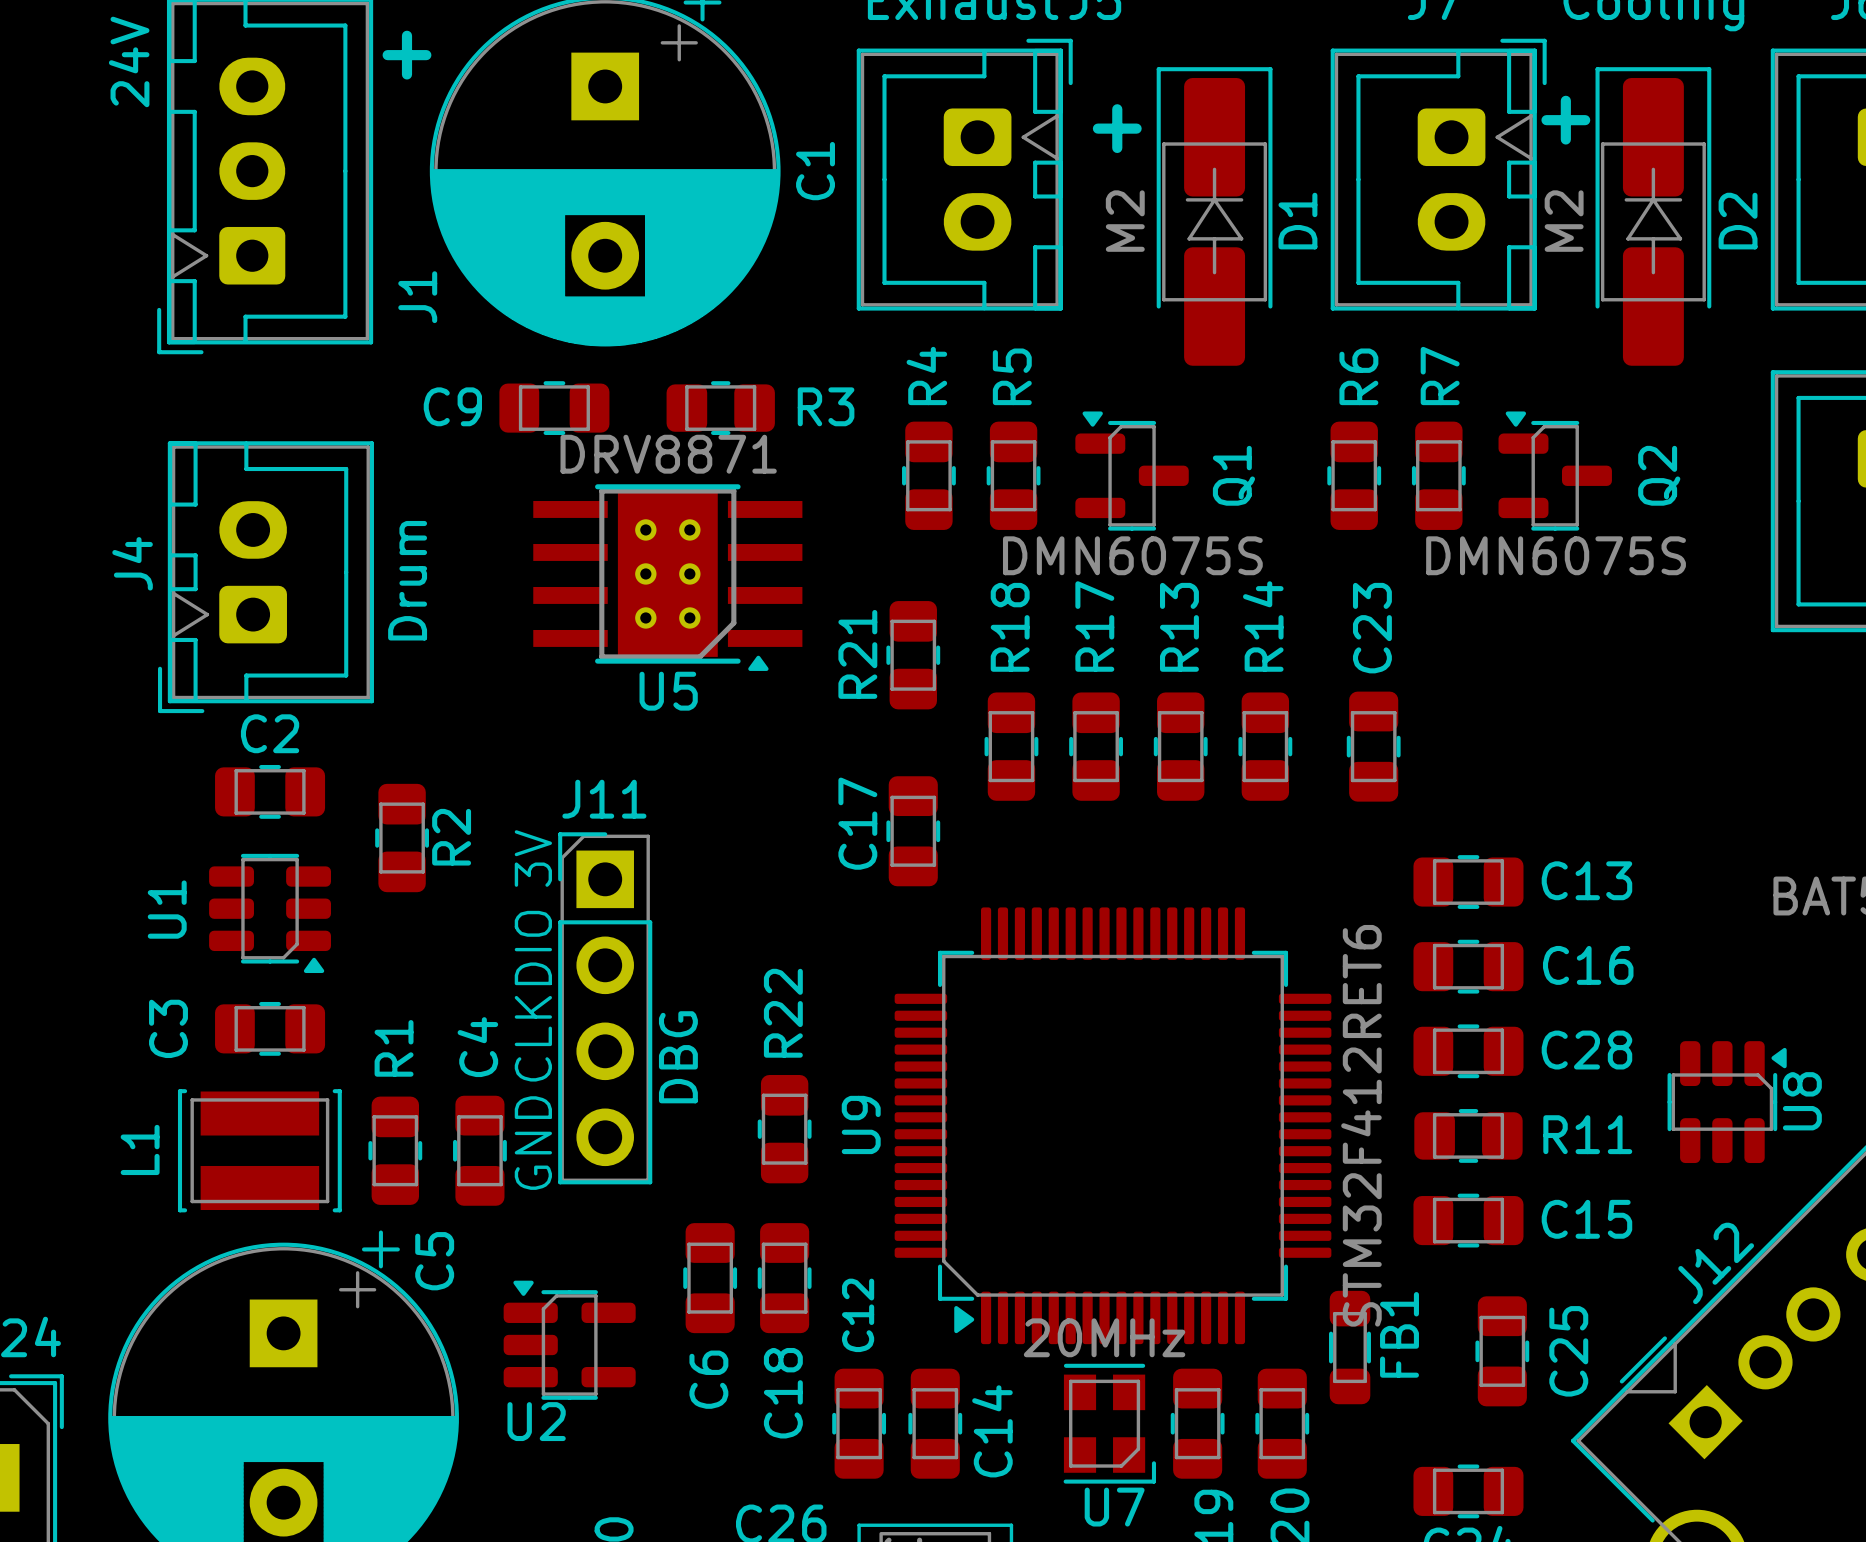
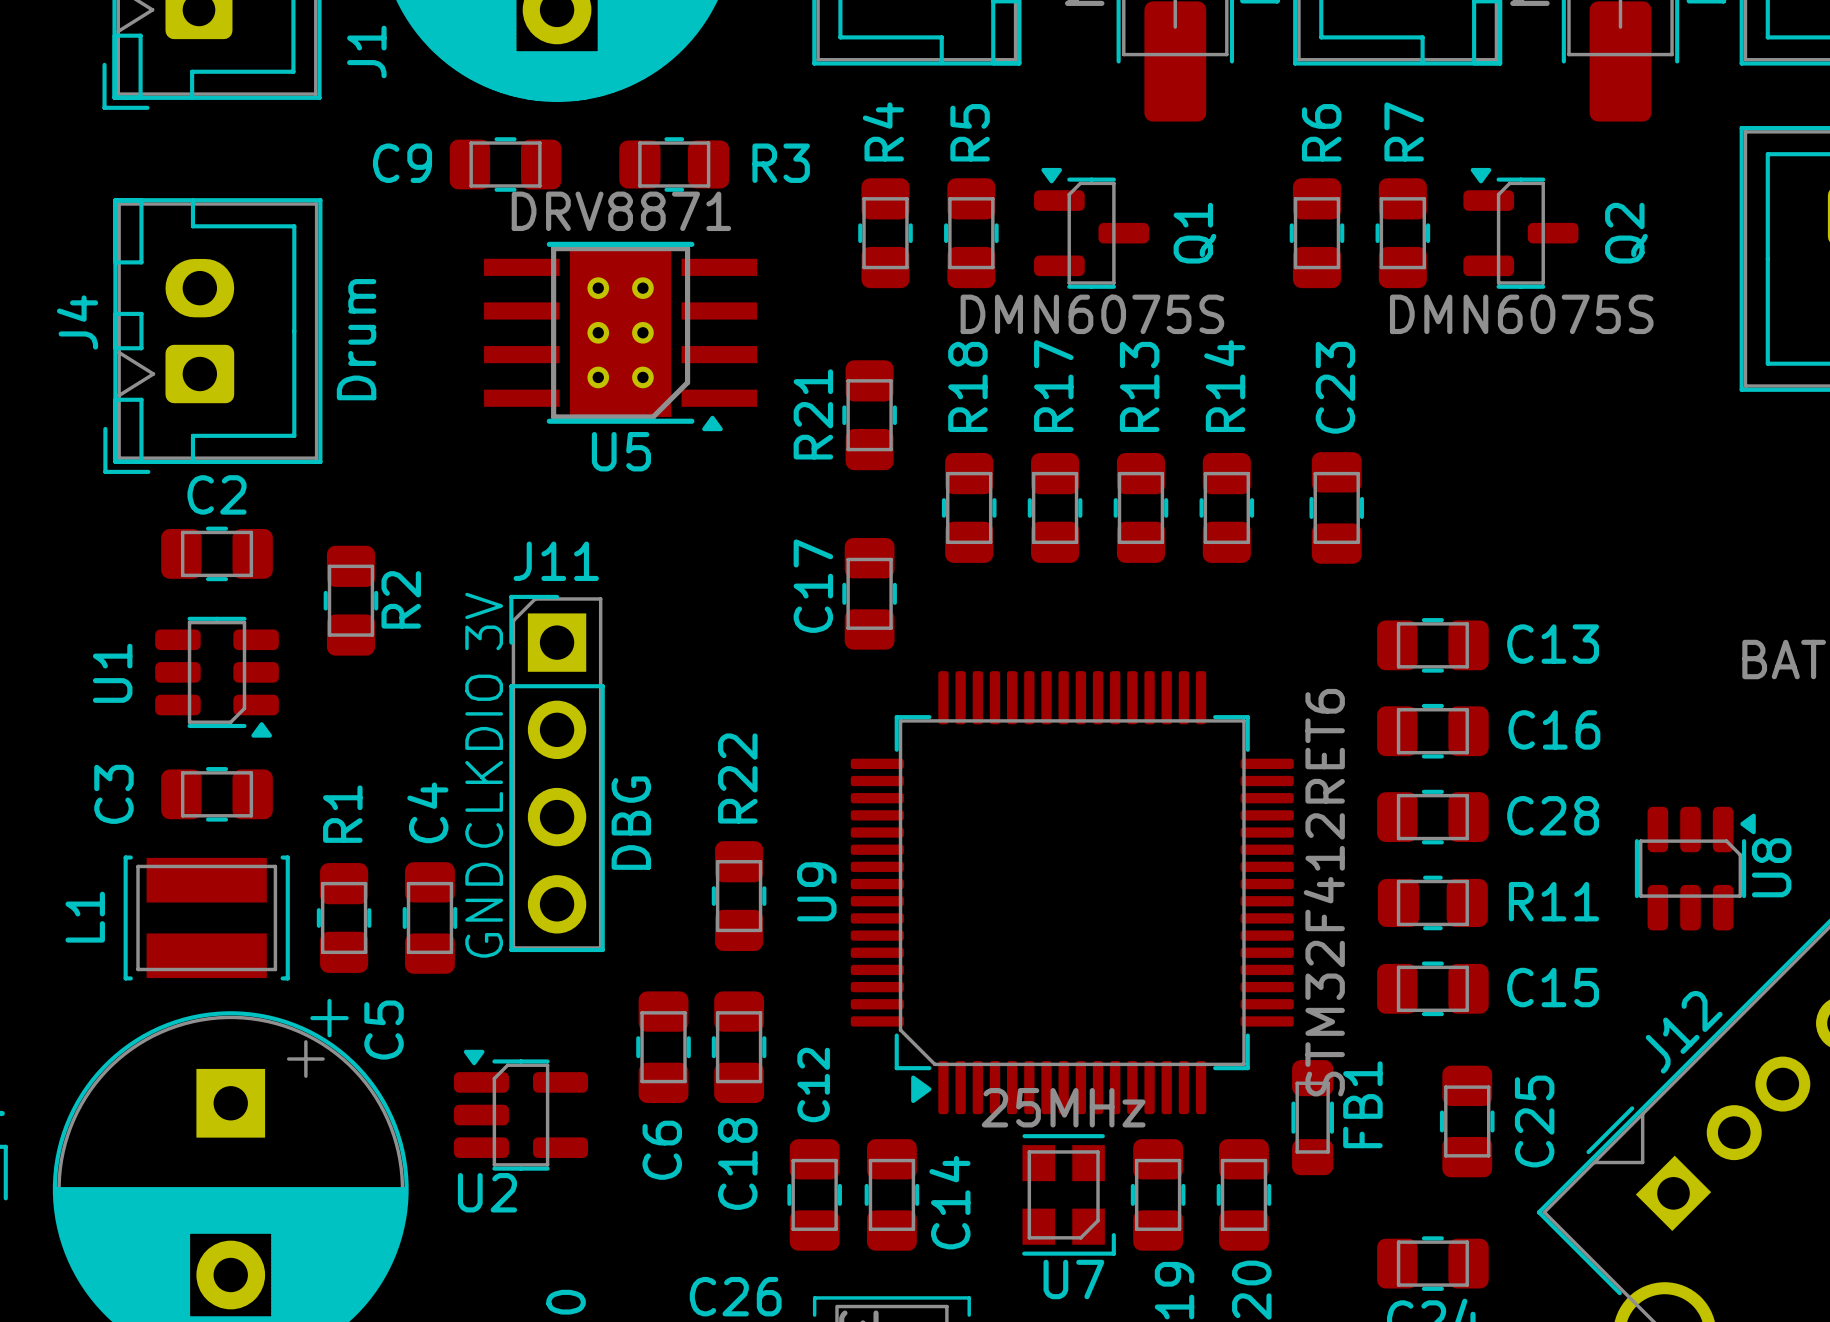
U7 value: 20MHz (1104, 1337) -> 25MHz (1063, 1107)

